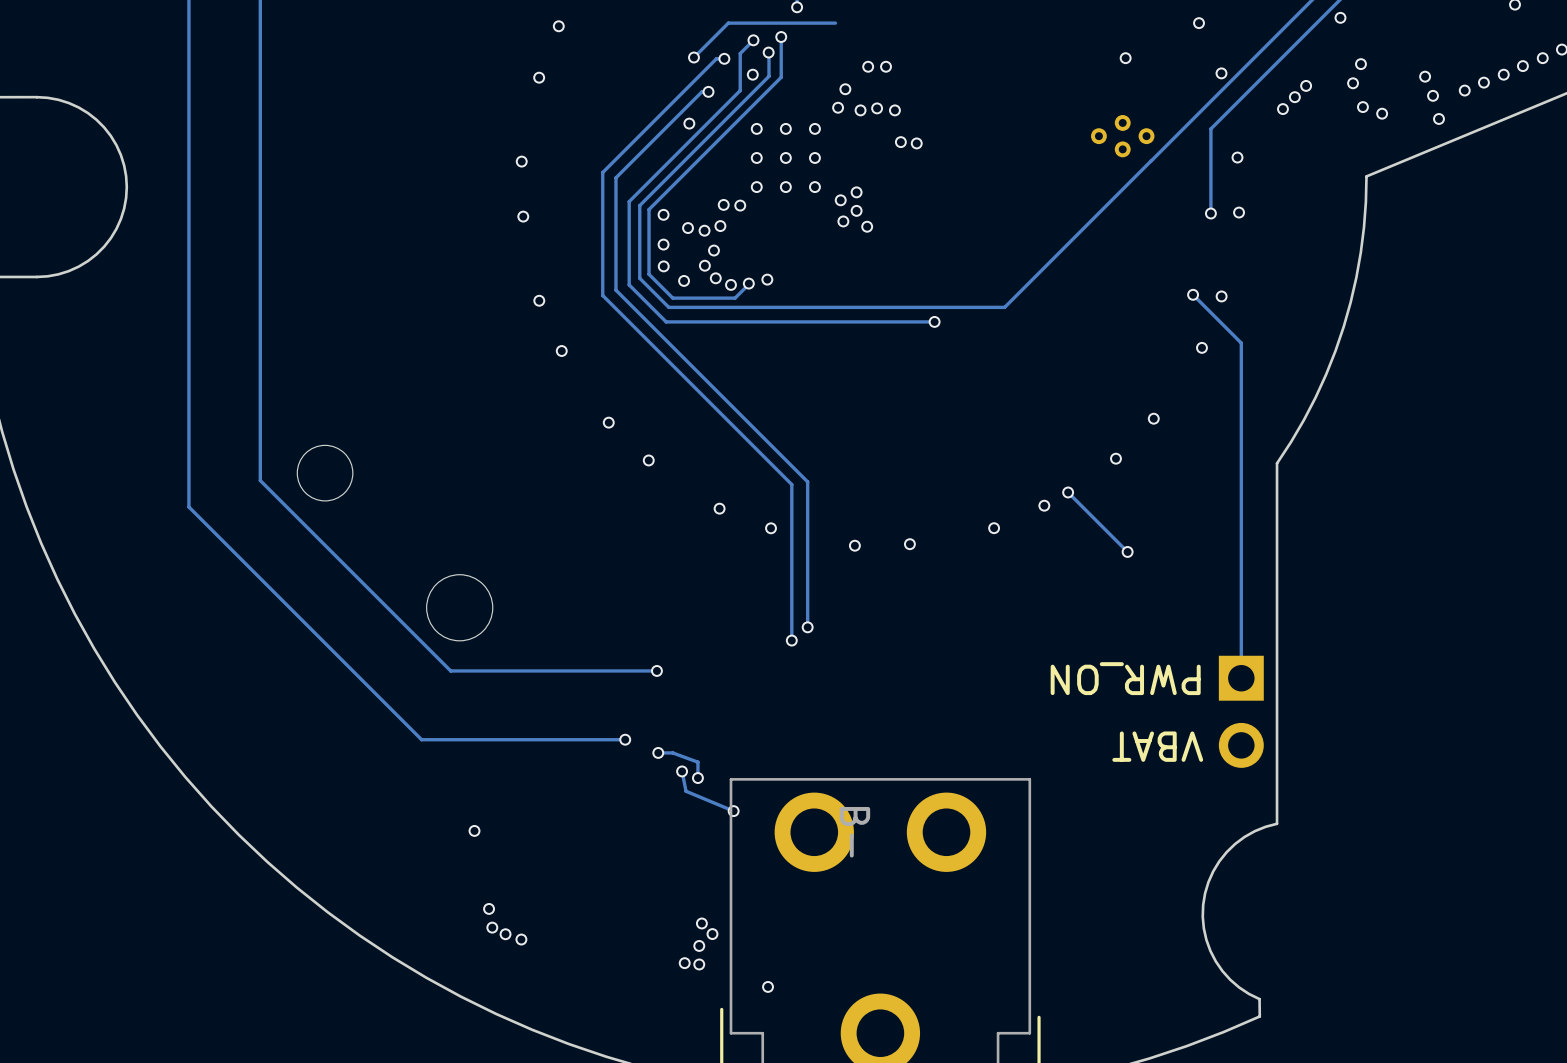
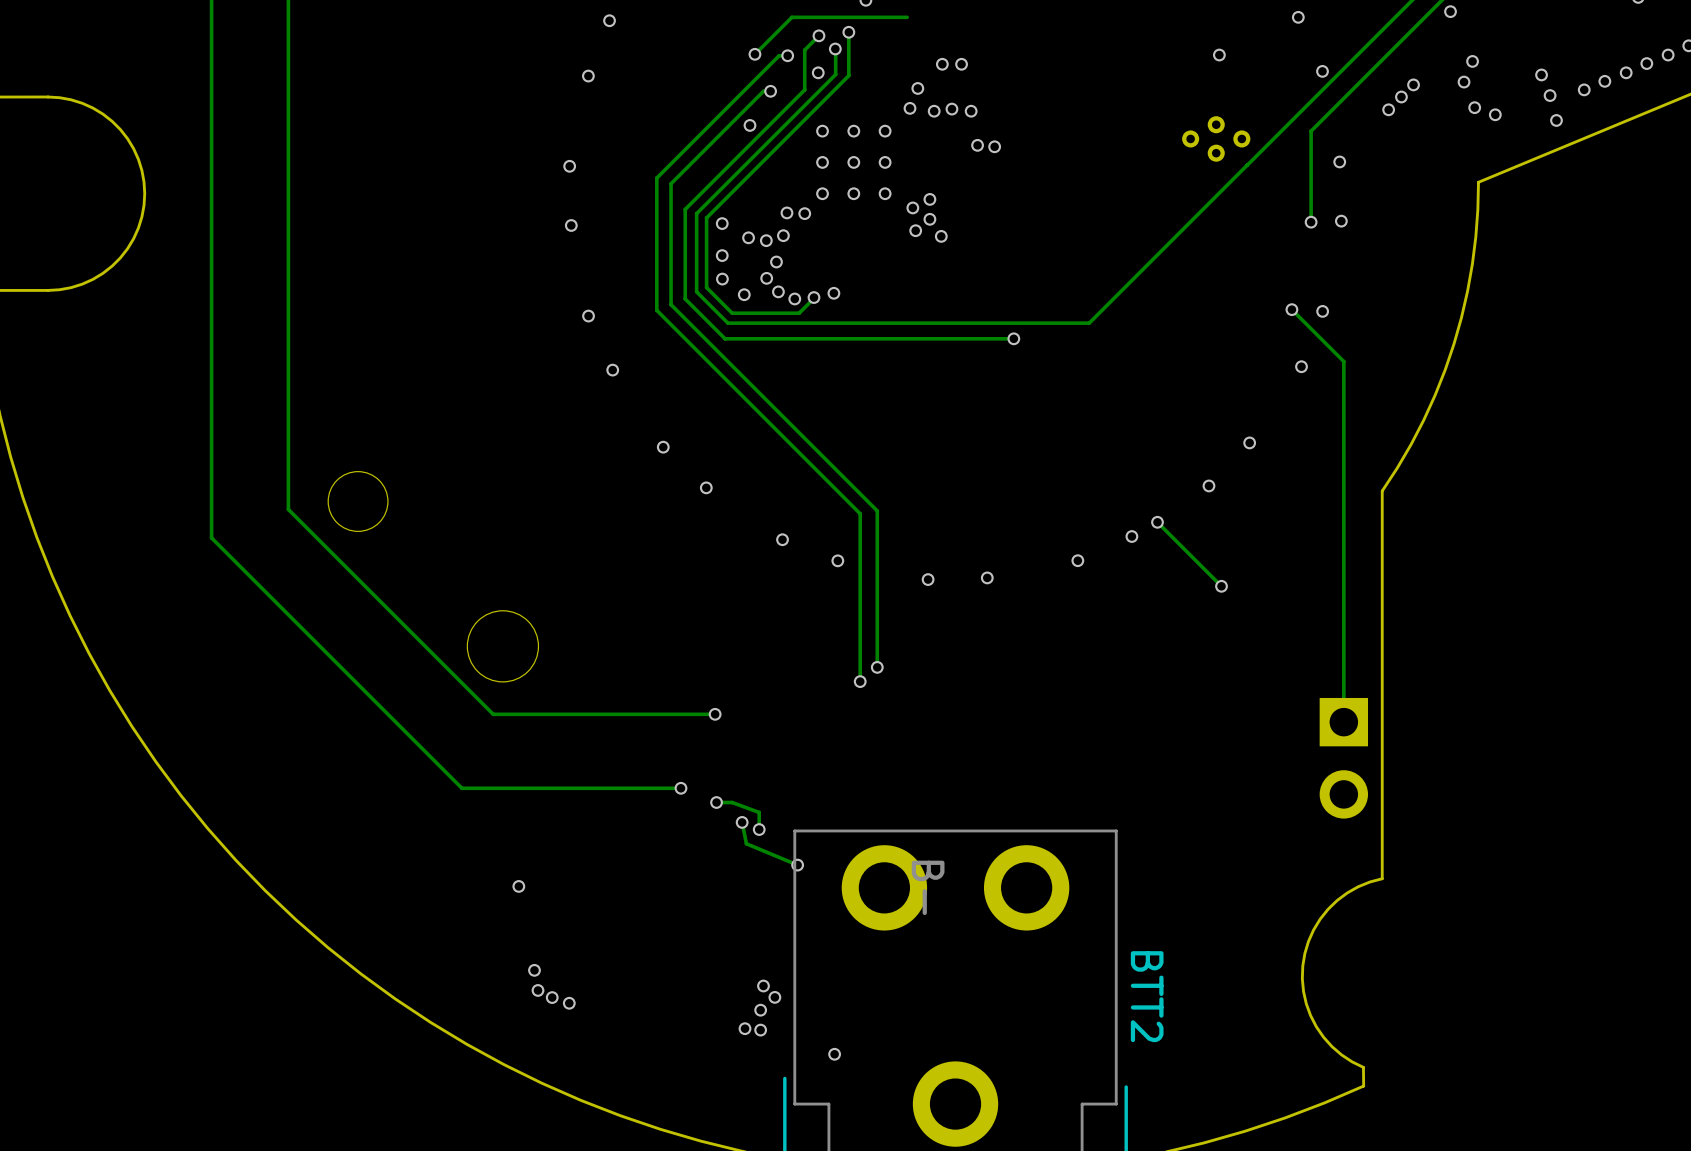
text: PWR_ON (1125, 678) -> none
text: VBAT (1157, 746) -> none
BTT2 name: none -> BTT2 (1147, 996)

